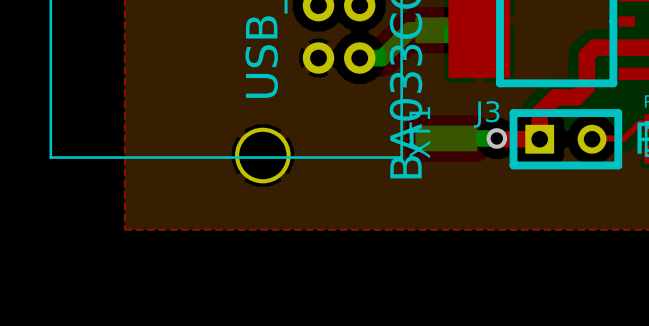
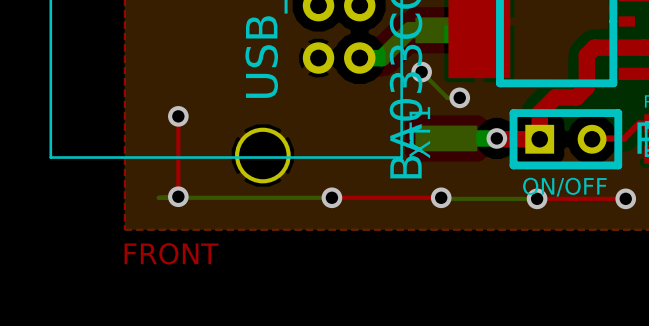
bottom track: none -> (421, 72) (447, 97) (459, 97)
via: none -> (421, 72)
via: none -> (459, 97)
J3 name: J3 (486, 114) -> none
top track: none -> (178, 116) (178, 196)
via: none -> (178, 116)
text: none -> ON/OFF (564, 187)
bottom track: none -> (178, 196) (158, 197) (331, 197)
via: none -> (178, 196)
top track: none -> (331, 197) (441, 197)
via: none -> (331, 197)
bottom track: none -> (441, 197) (537, 198)
via: none -> (441, 197)
top track: none -> (537, 198) (625, 198)
via: none -> (537, 198)
via: none -> (625, 198)
text: none -> FRONT (171, 253)

